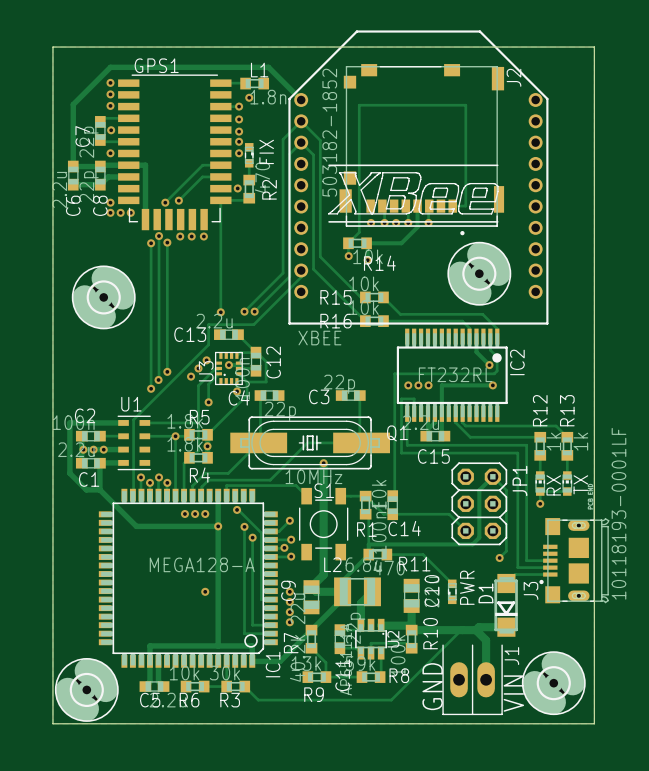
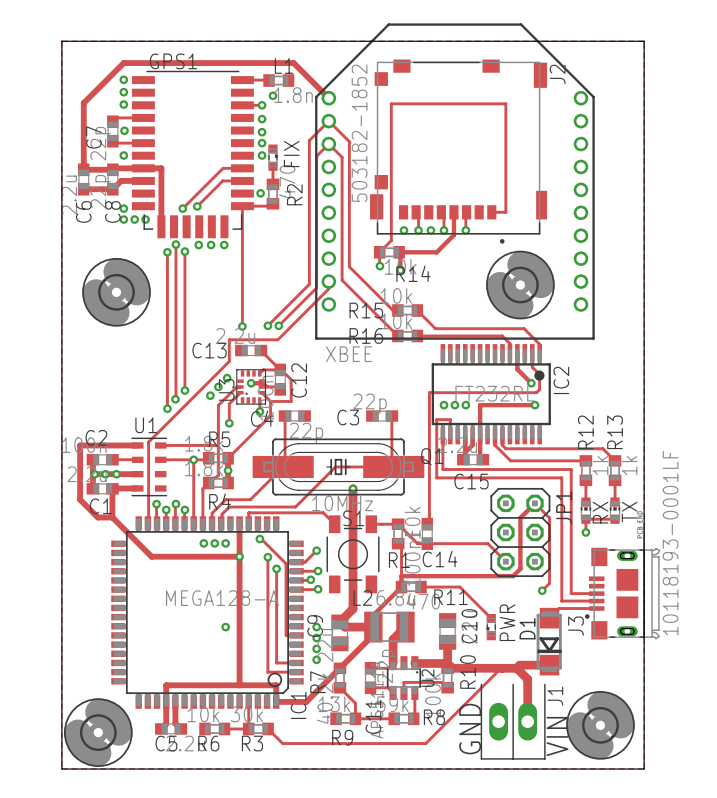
part footprint: [288, 30, 549, 325] -> [315, 23, 595, 340]
part position: (103, 297) -> (116, 292)
J3 footprint: [539, 494, 610, 604] -> [584, 522, 661, 640]

